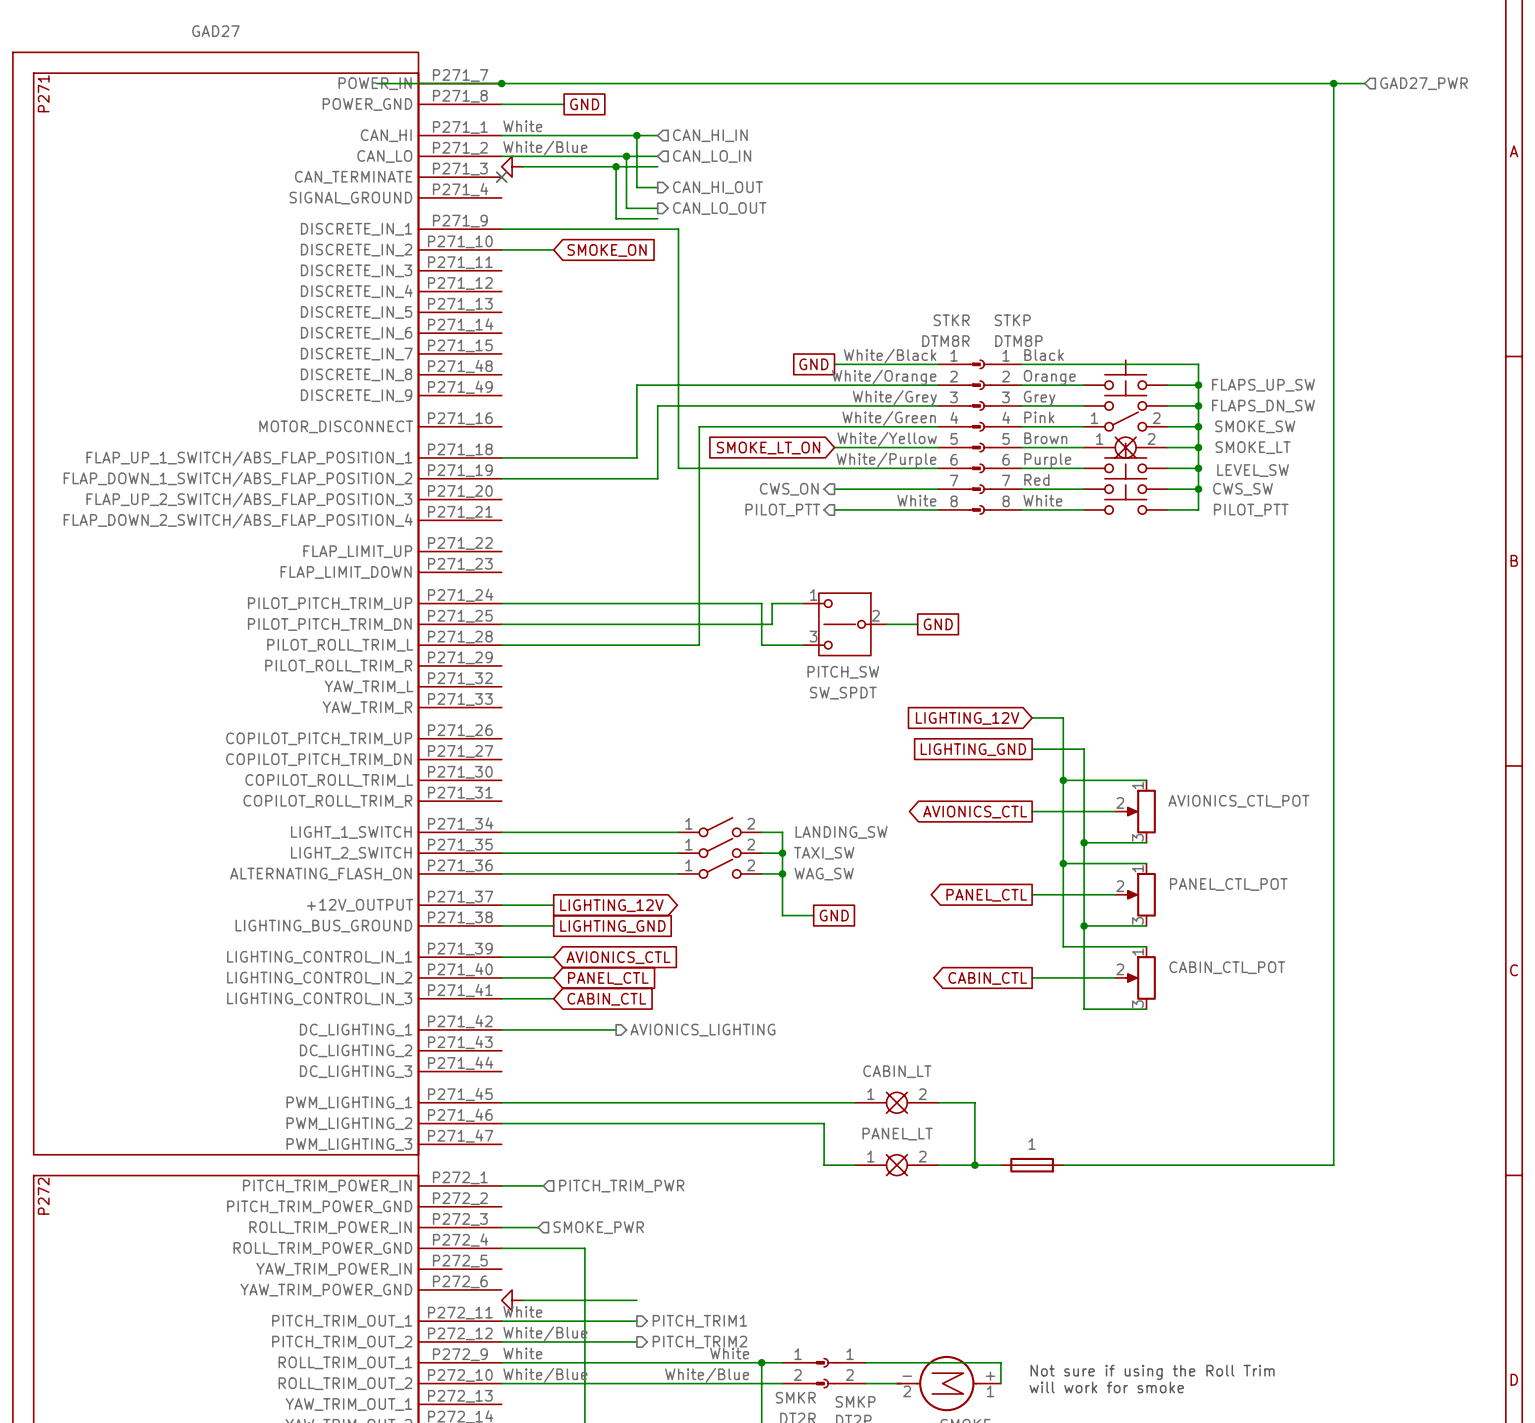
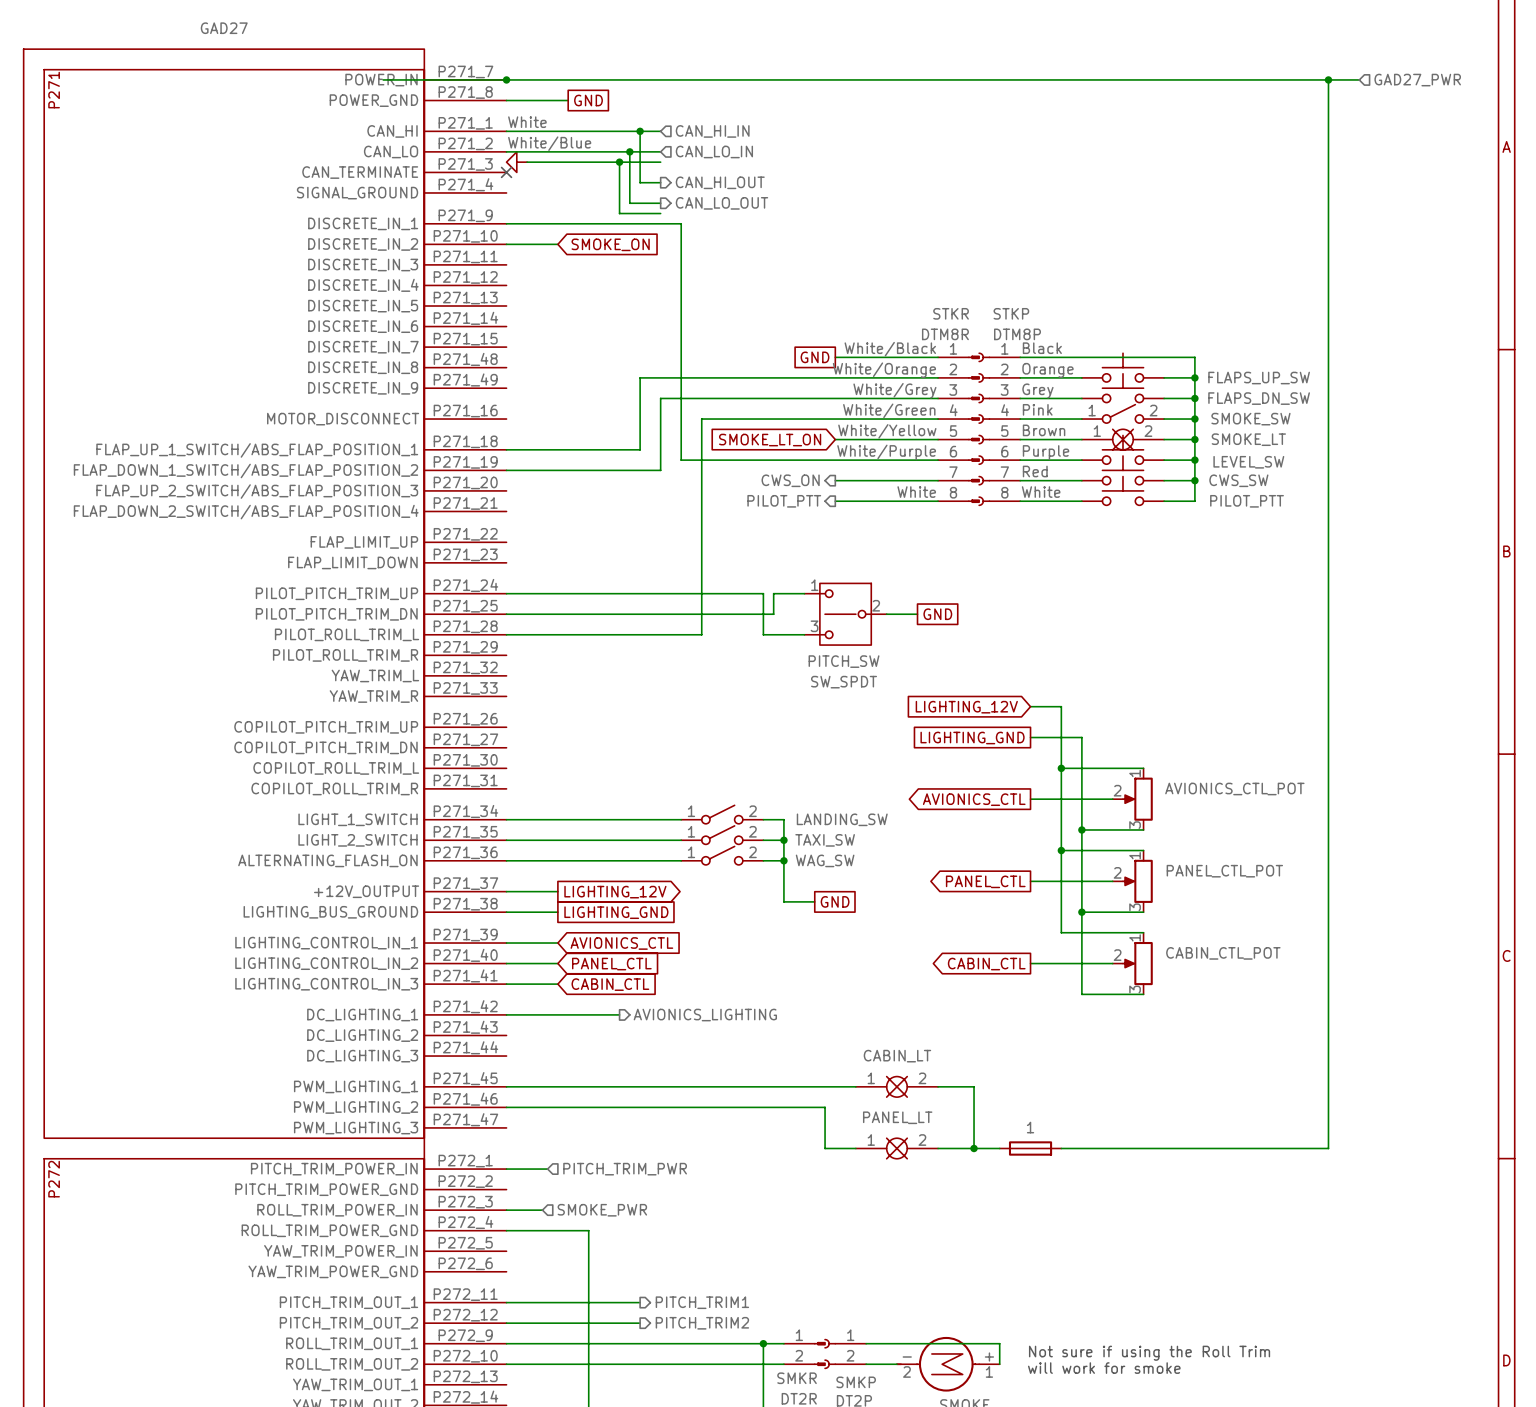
power symbol: (512, 1300) -> none
wire: (522, 1300) (636, 1300) -> none
label: White (522, 1311) -> none
label: White/Blue (545, 1333) -> none
label: White (522, 1353) -> none
label: White (729, 1353) -> none
label: White/Blue (545, 1375) -> none
label: White/Blue (707, 1375) -> none

